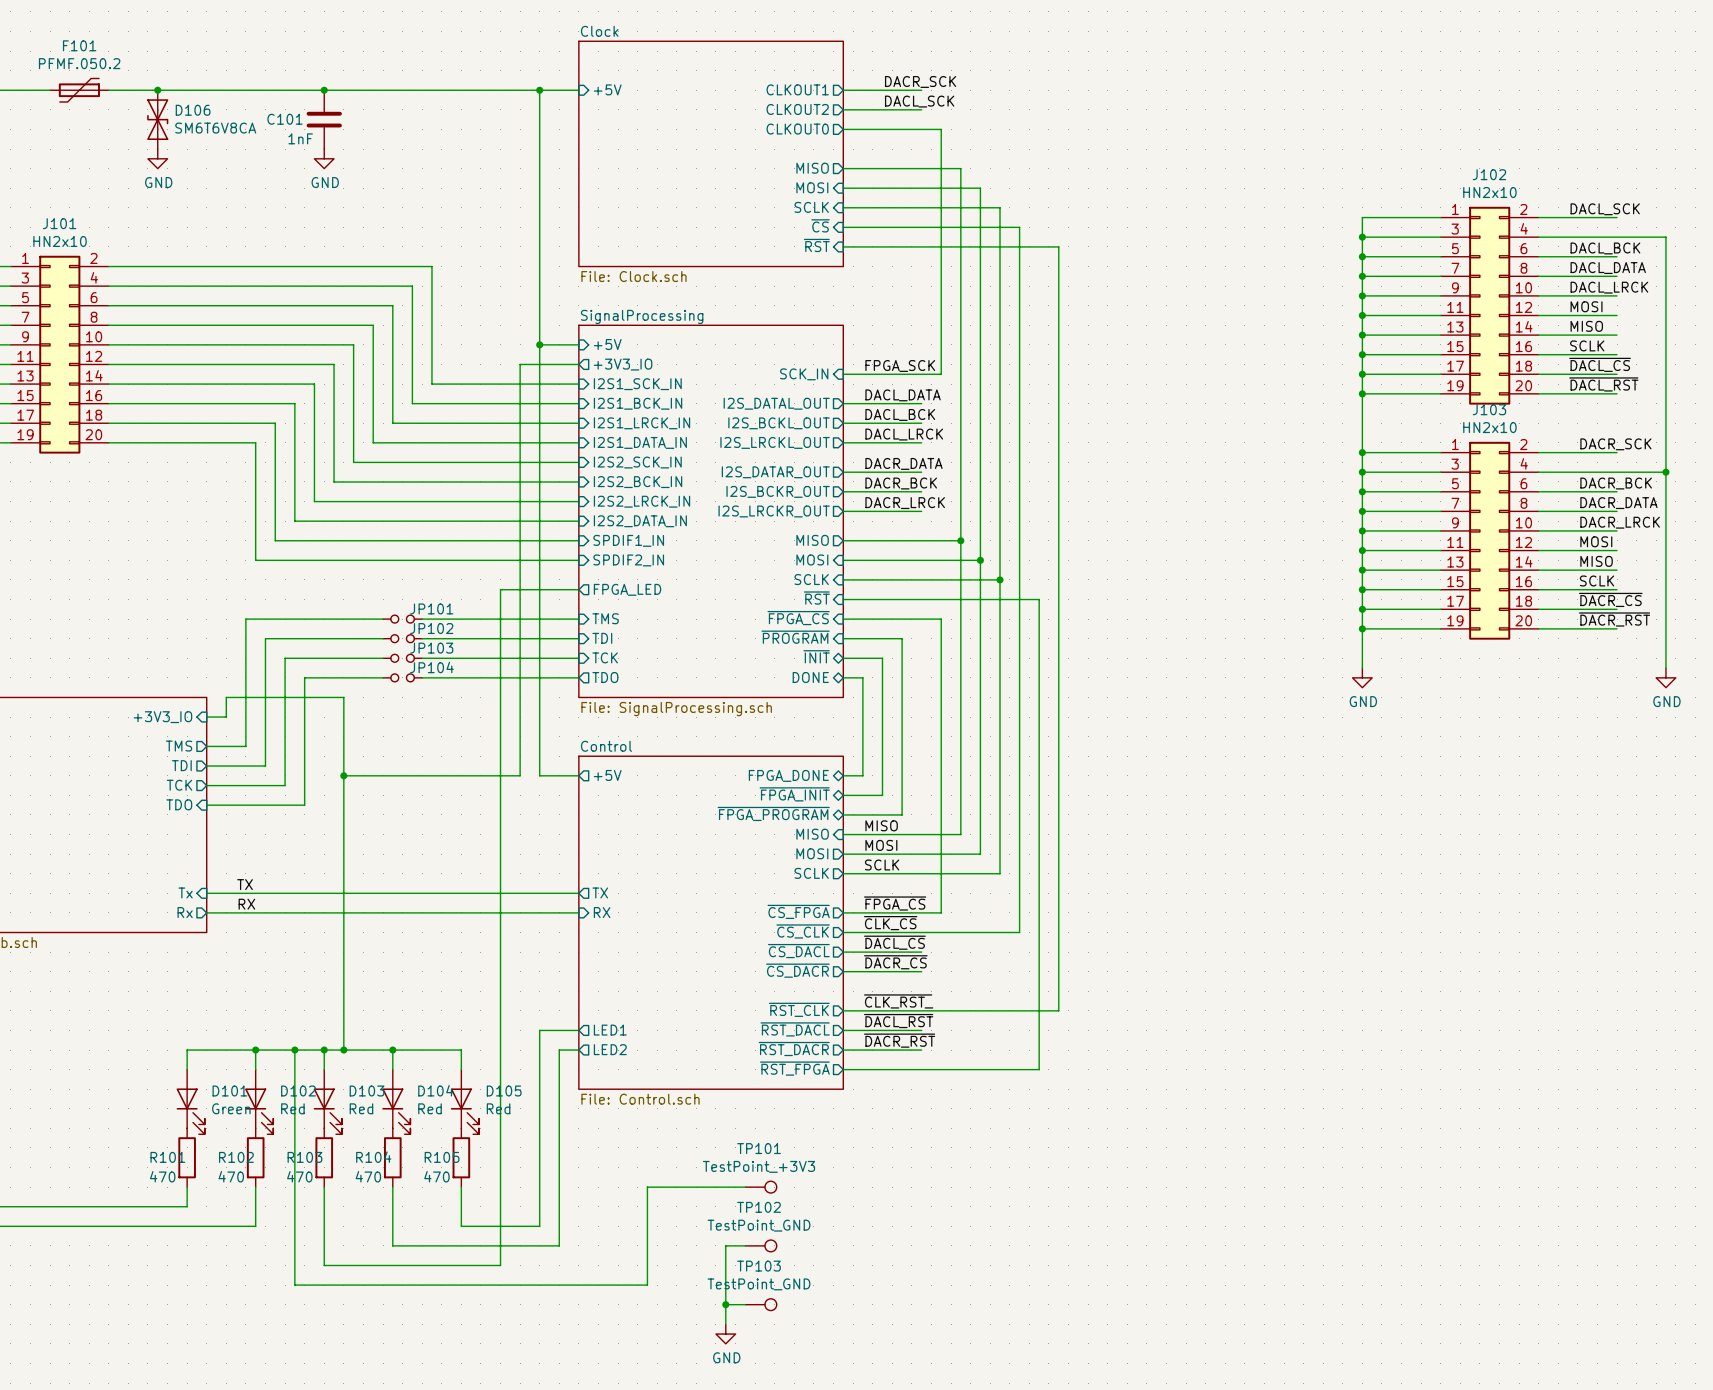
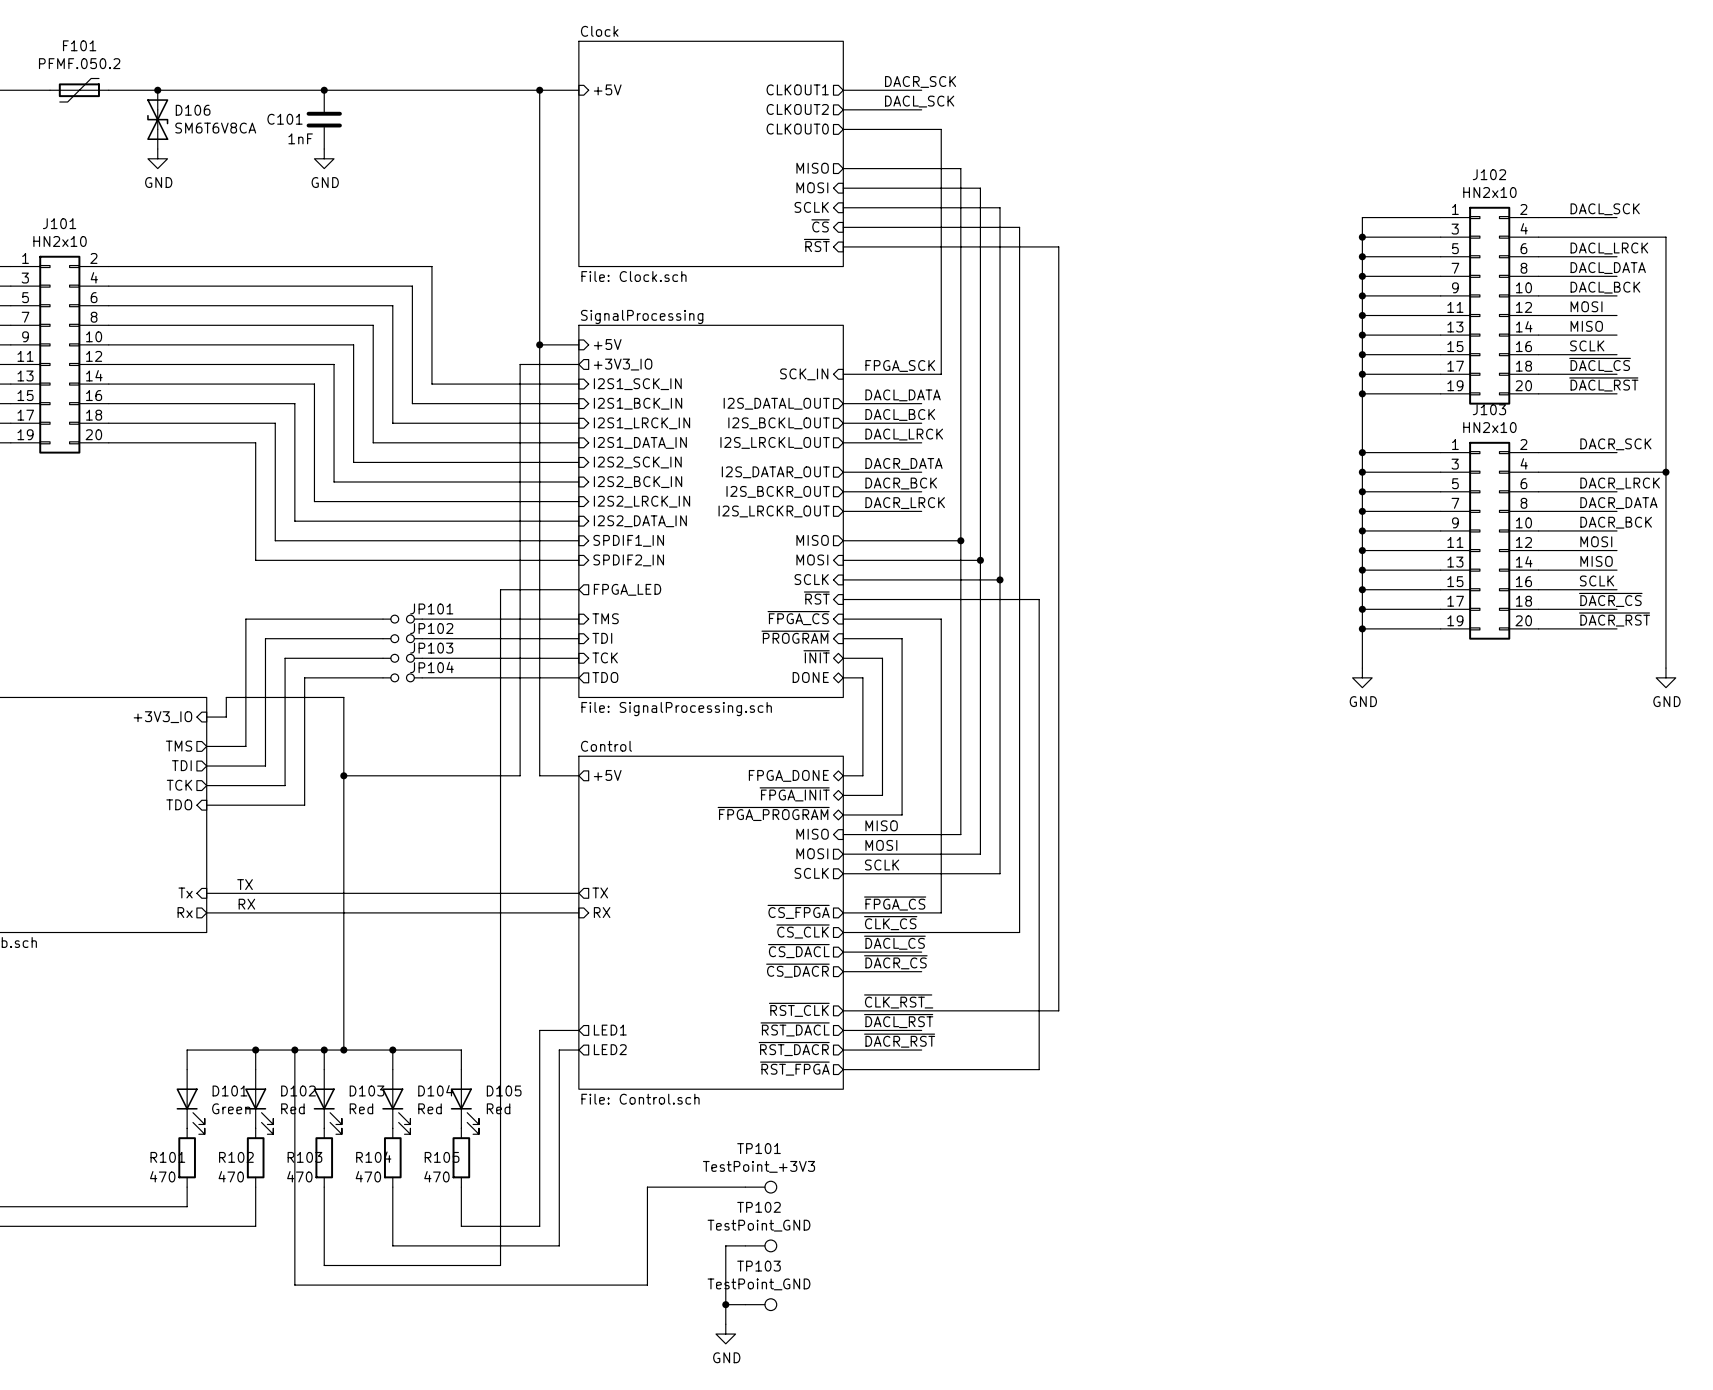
label: DACL_BCK (1605, 248) -> DACL_LRCK (1609, 248)
label: DACL_LRCK (1609, 287) -> DACL_BCK (1605, 287)
label: DACR_BCK (1616, 483) -> DACR_LRCK (1620, 483)
label: DACR_LRCK (1620, 522) -> DACR_BCK (1616, 522)

